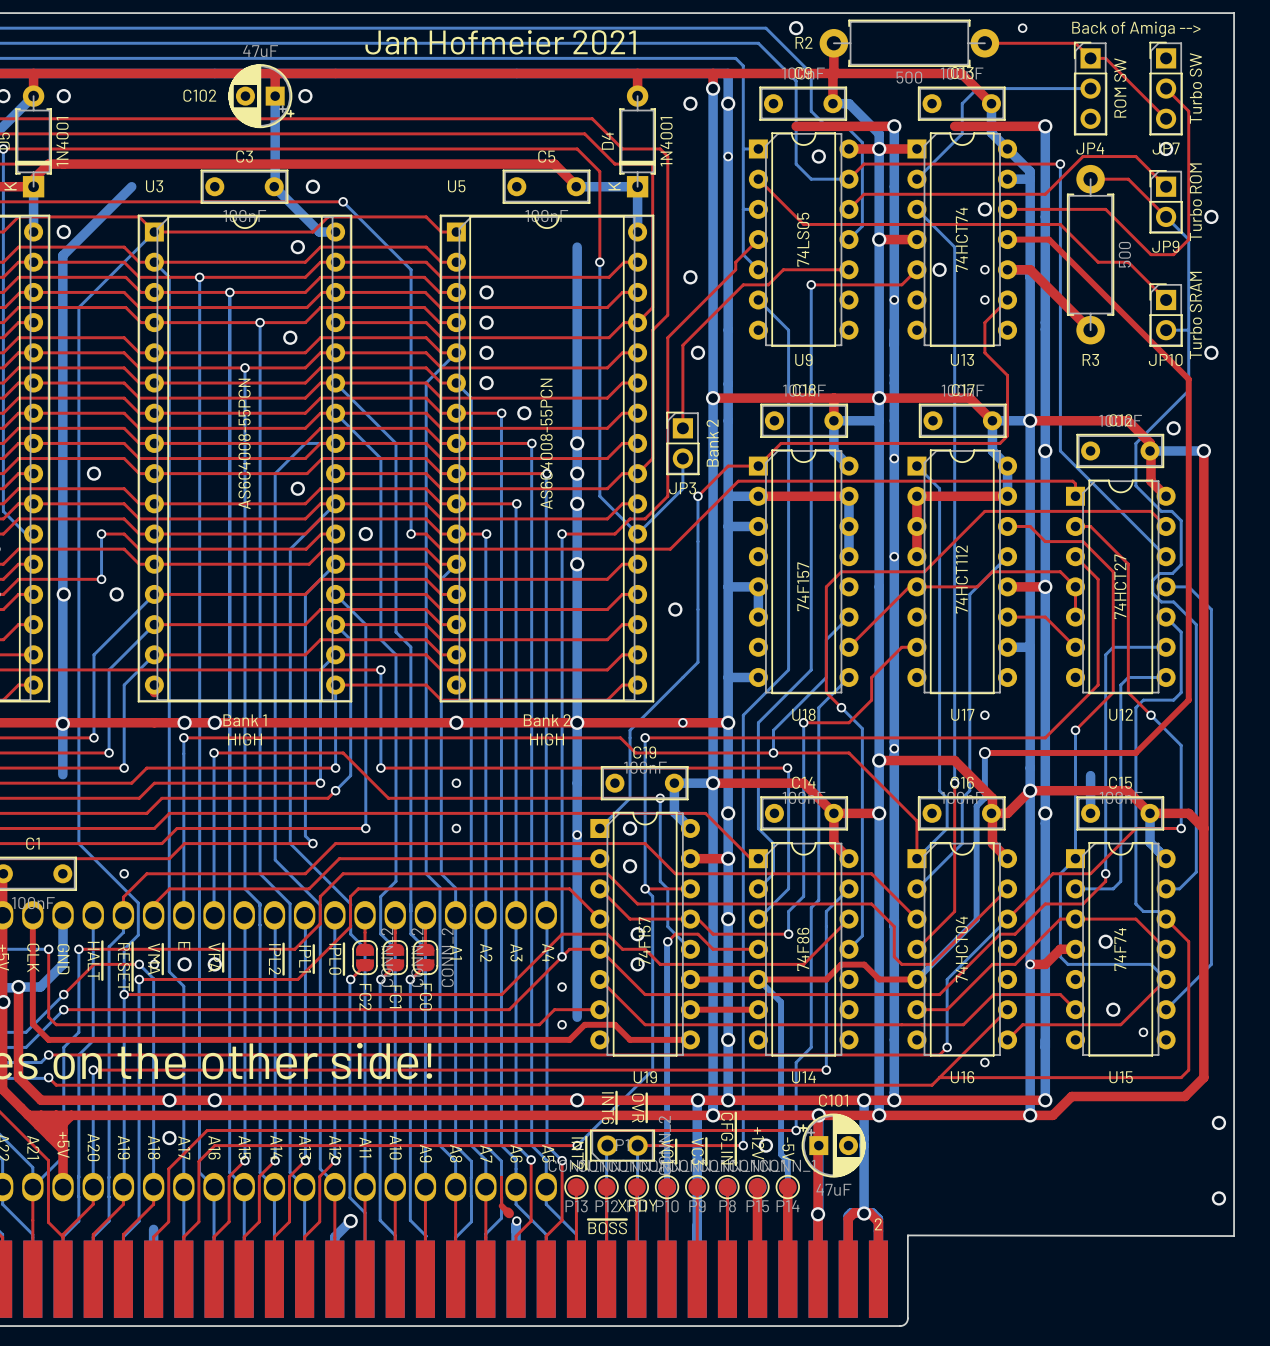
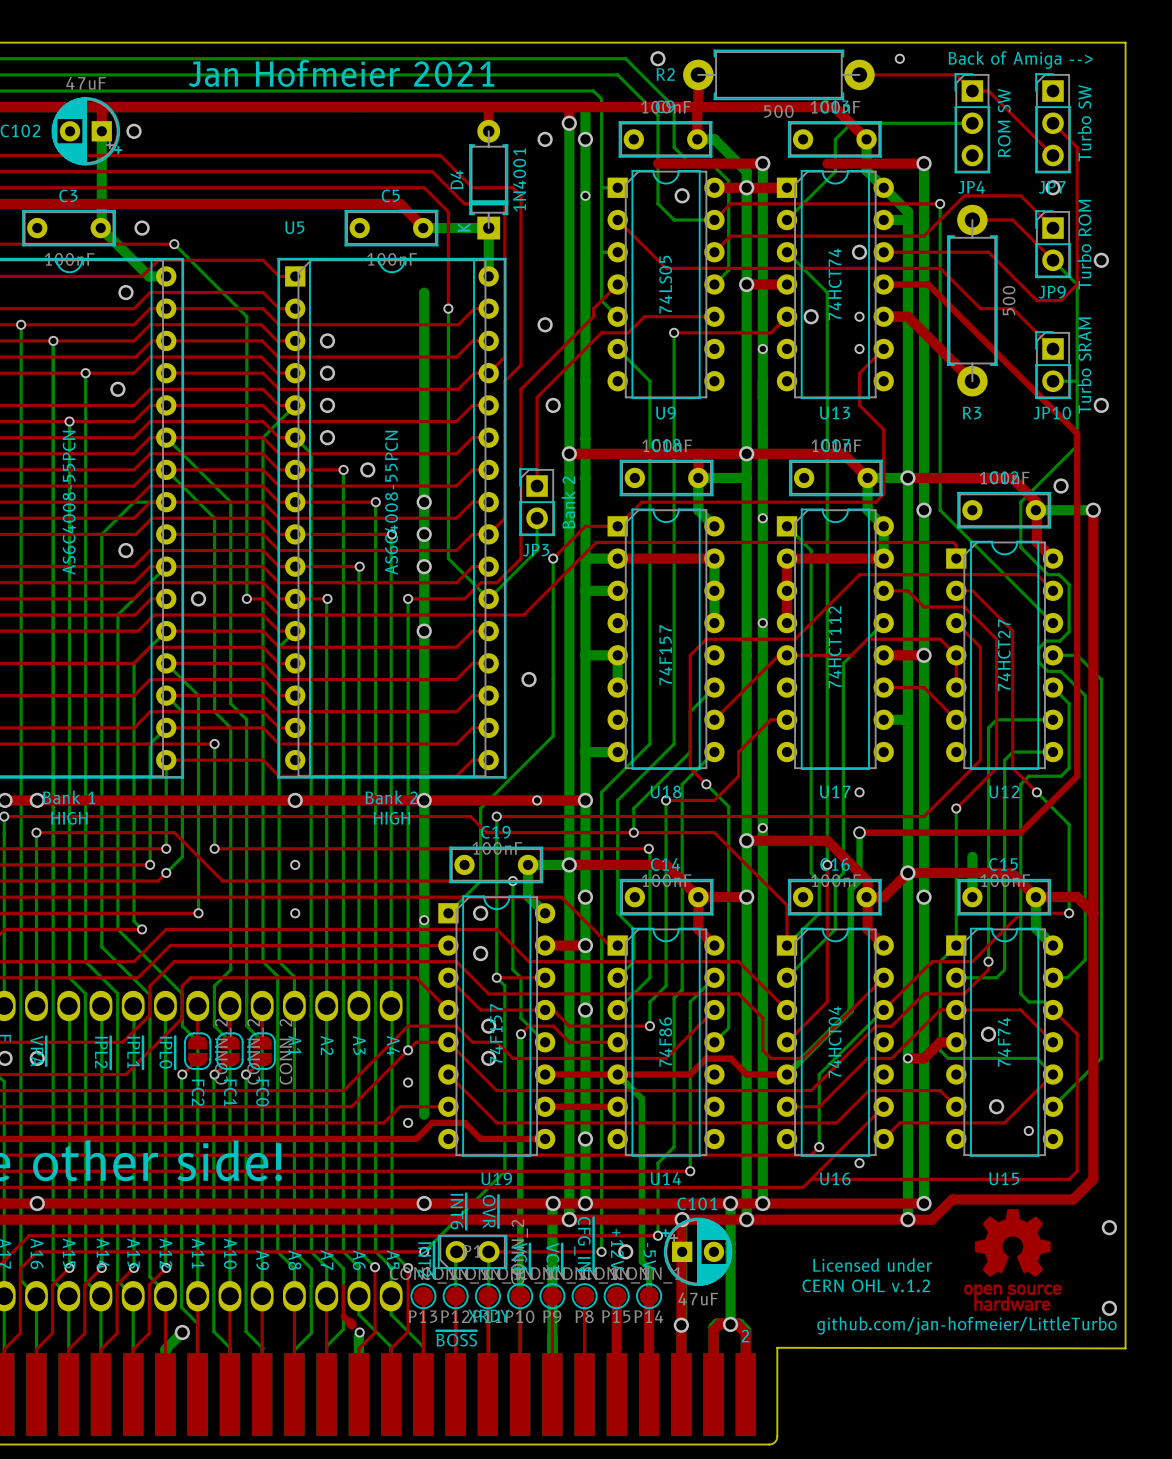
drawing: none -> [964, 1209, 1062, 1311]
text: none -> Licensed under (872, 1265)
text: none -> CERN OHL v.1.2 (866, 1285)
text: none -> github.com/jan-hofmeier/LittleTurbo (966, 1325)

